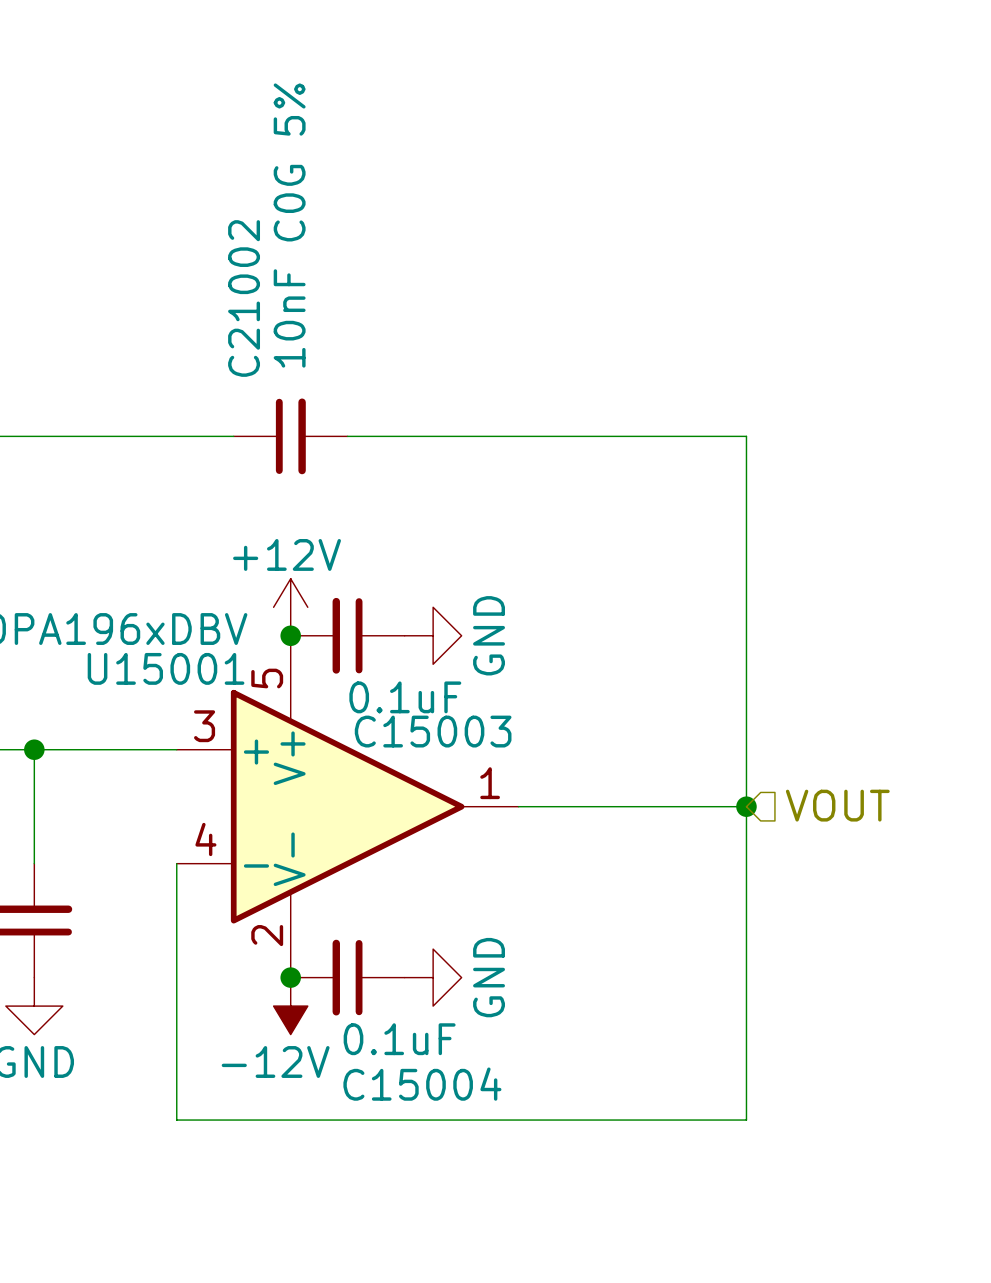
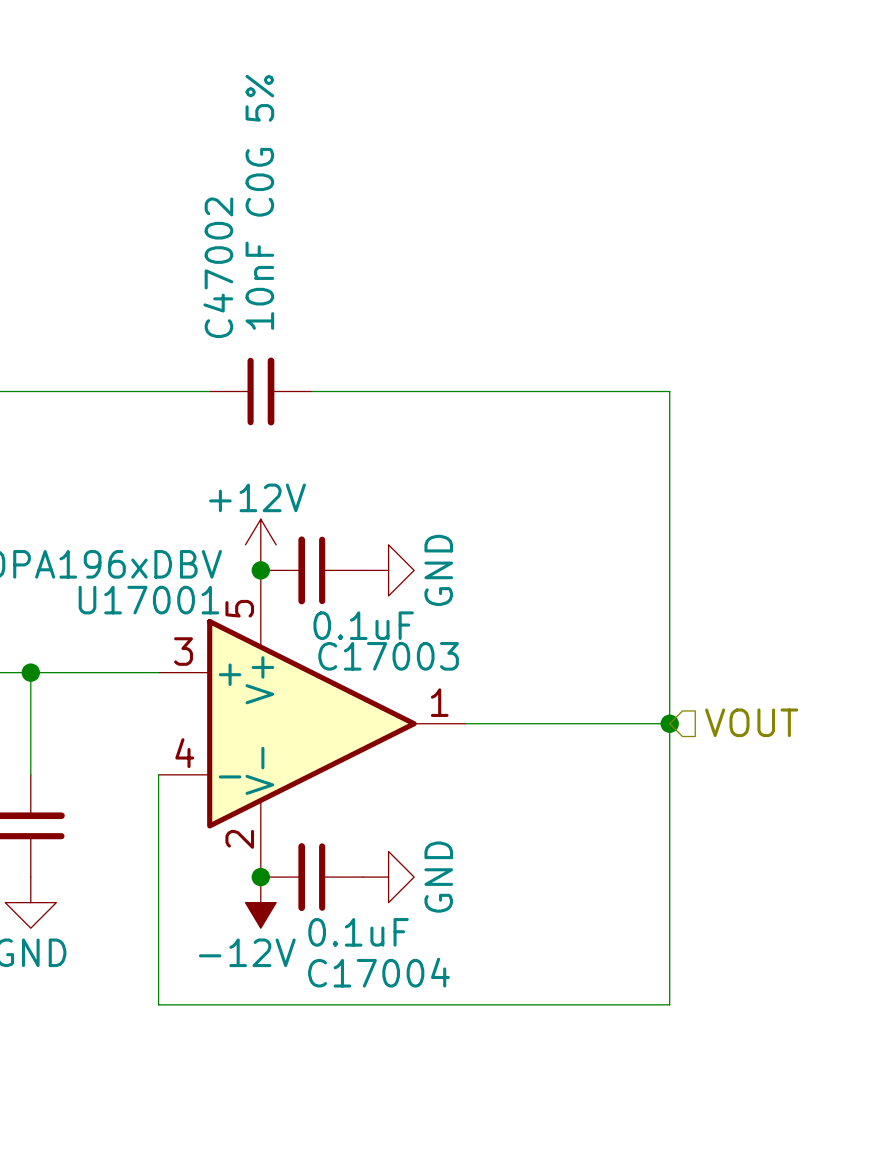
C21002 name: C21002 (244, 298) -> C47002 (218, 267)
U15001 name: U15001 (166, 668) -> U17001 (148, 600)
C15003 name: C15003 (433, 731) -> C17003 (388, 656)
C15004 name: C15004 (422, 1084) -> C17004 (378, 972)

